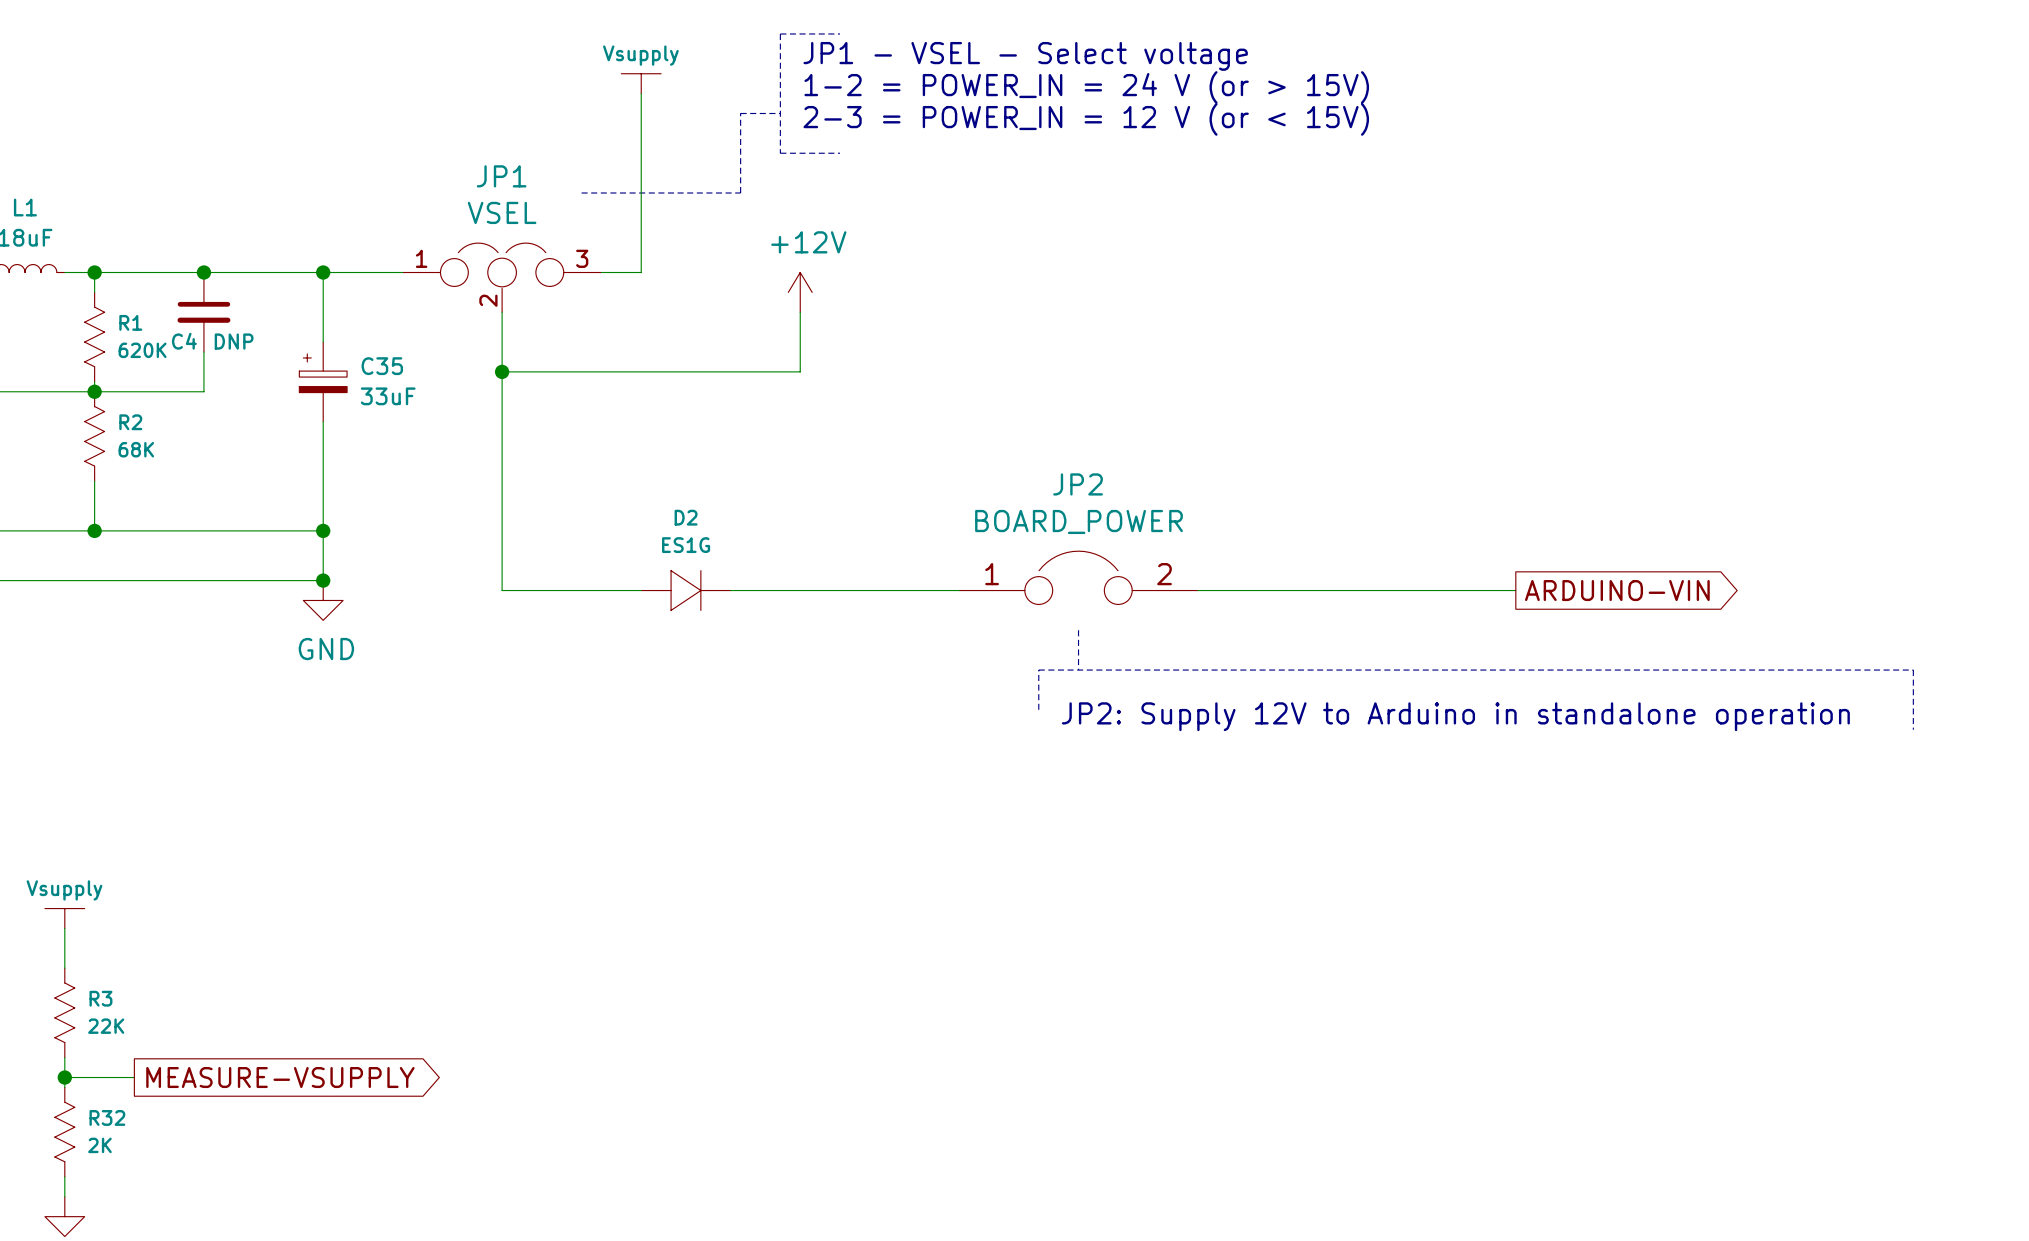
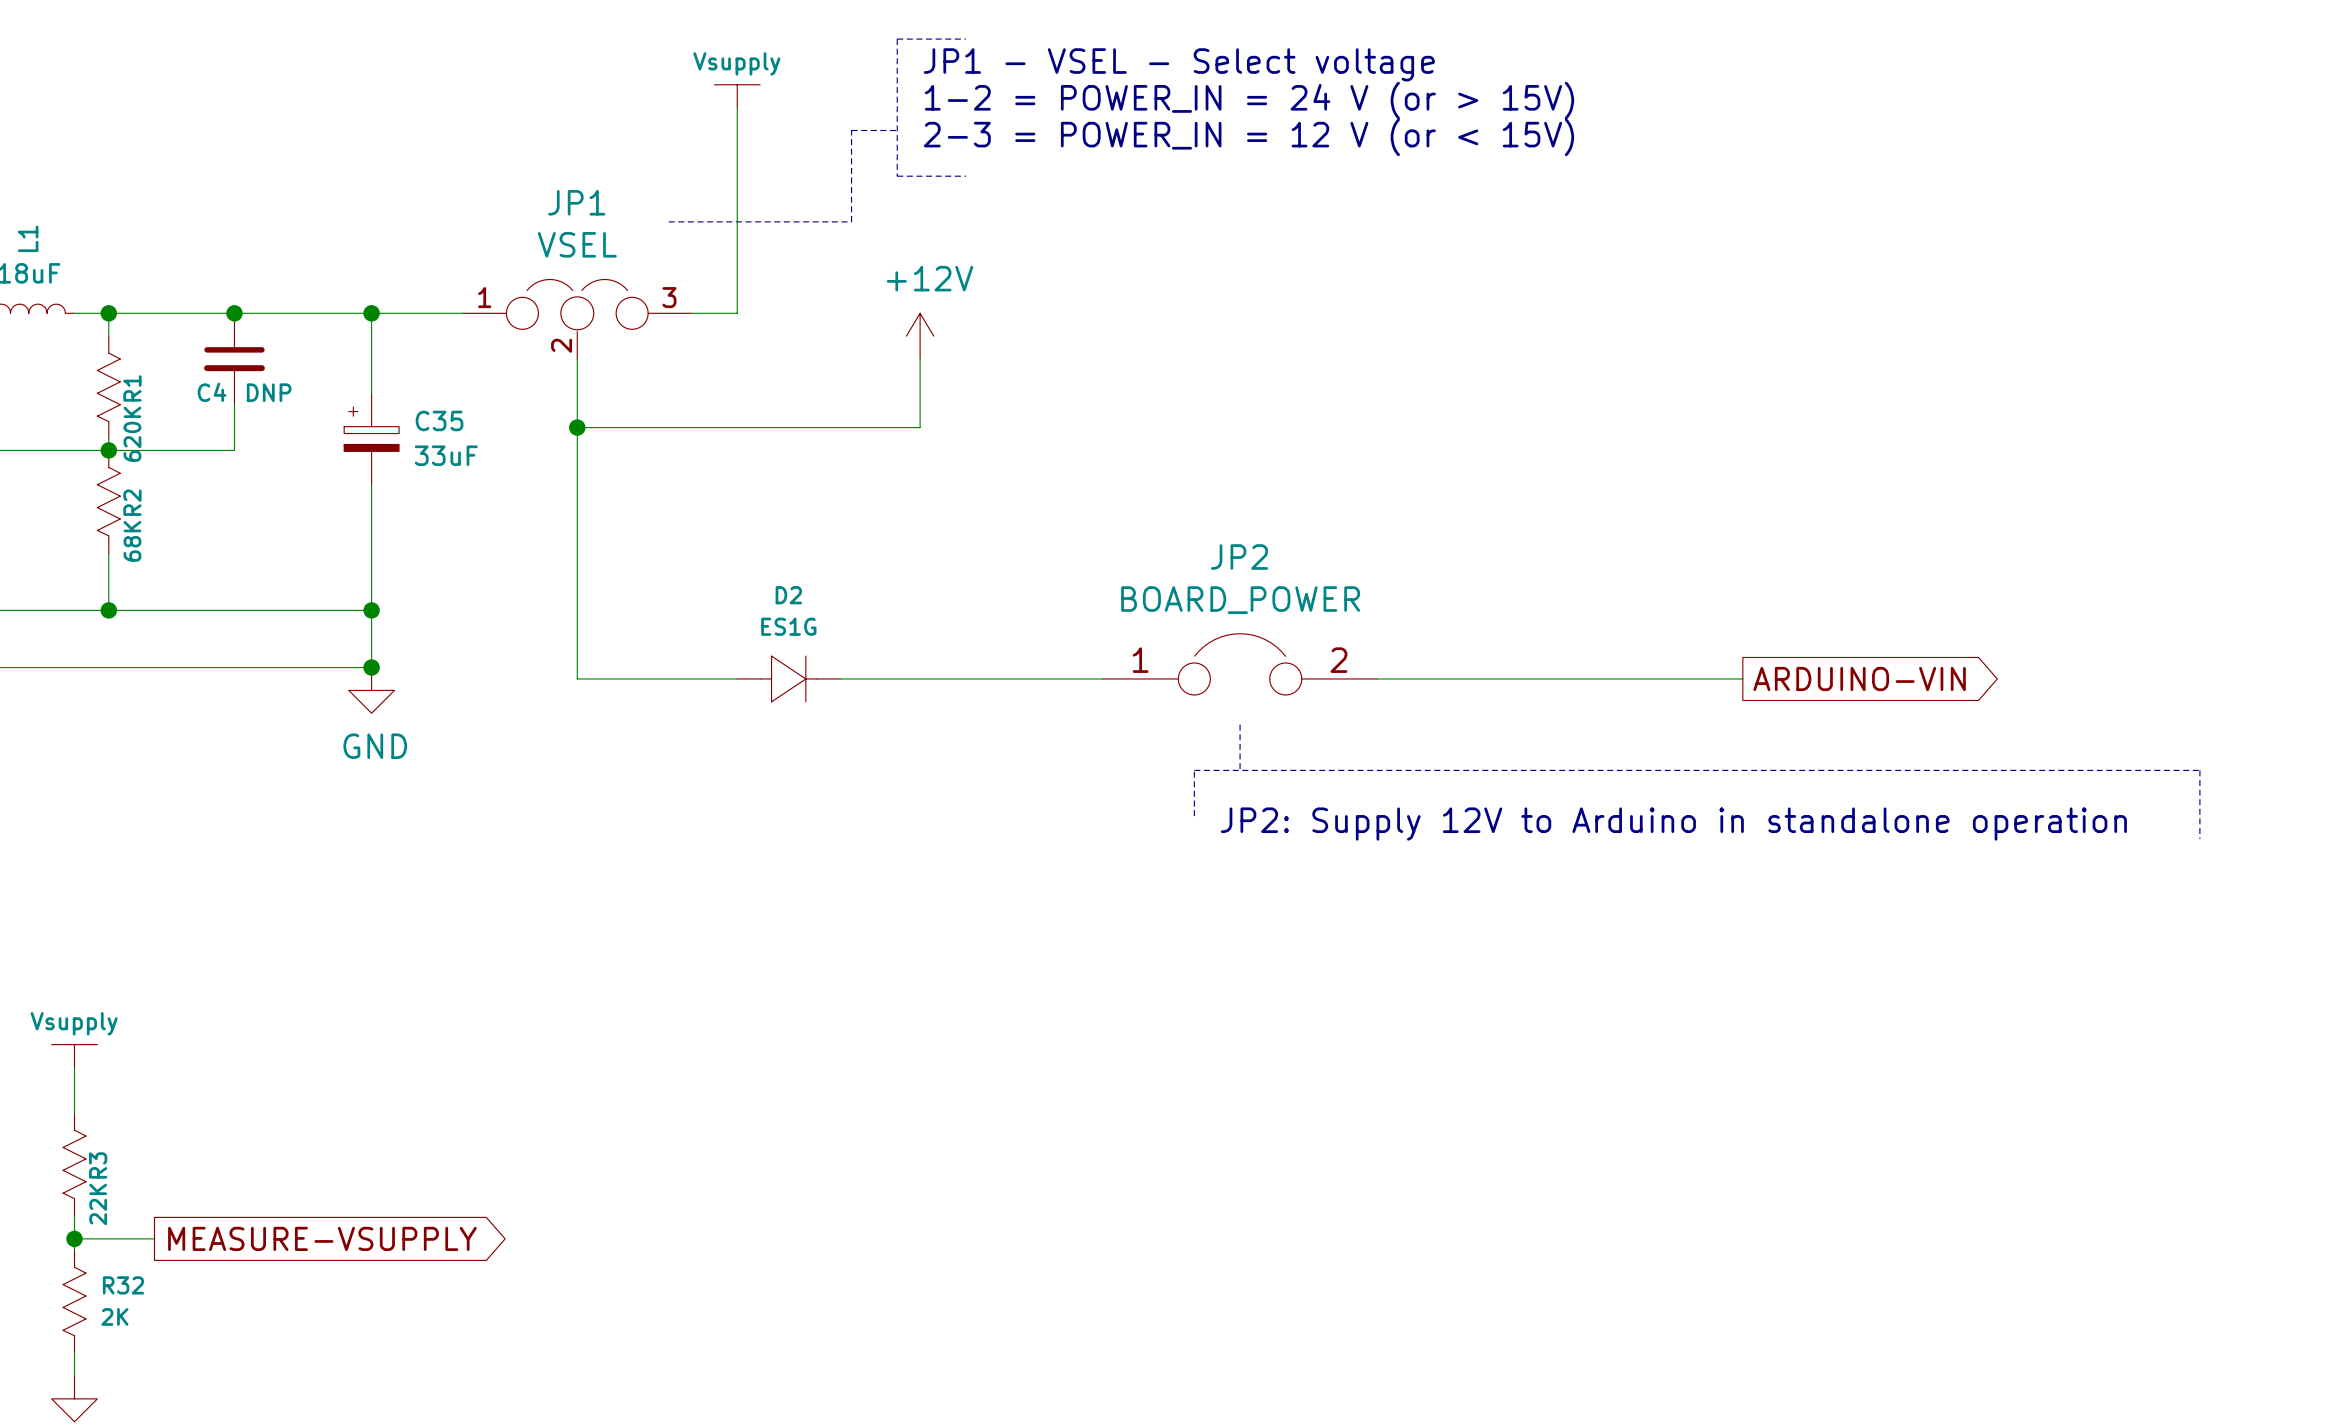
L1 name rotation: 0° (25, 207) -> 90° counterclockwise (28, 238)
R1 name rotation: 0° (130, 322) -> 90° counterclockwise (132, 388)
R1 value rotation: 0° (142, 350) -> 90° counterclockwise (132, 434)
R2 name rotation: 0° (130, 422) -> 90° counterclockwise (132, 502)
R2 value rotation: 0° (136, 449) -> 90° counterclockwise (132, 541)
R3 name rotation: 0° (100, 998) -> 90° counterclockwise (98, 1165)
R3 value rotation: 0° (106, 1026) -> 90° counterclockwise (98, 1204)

